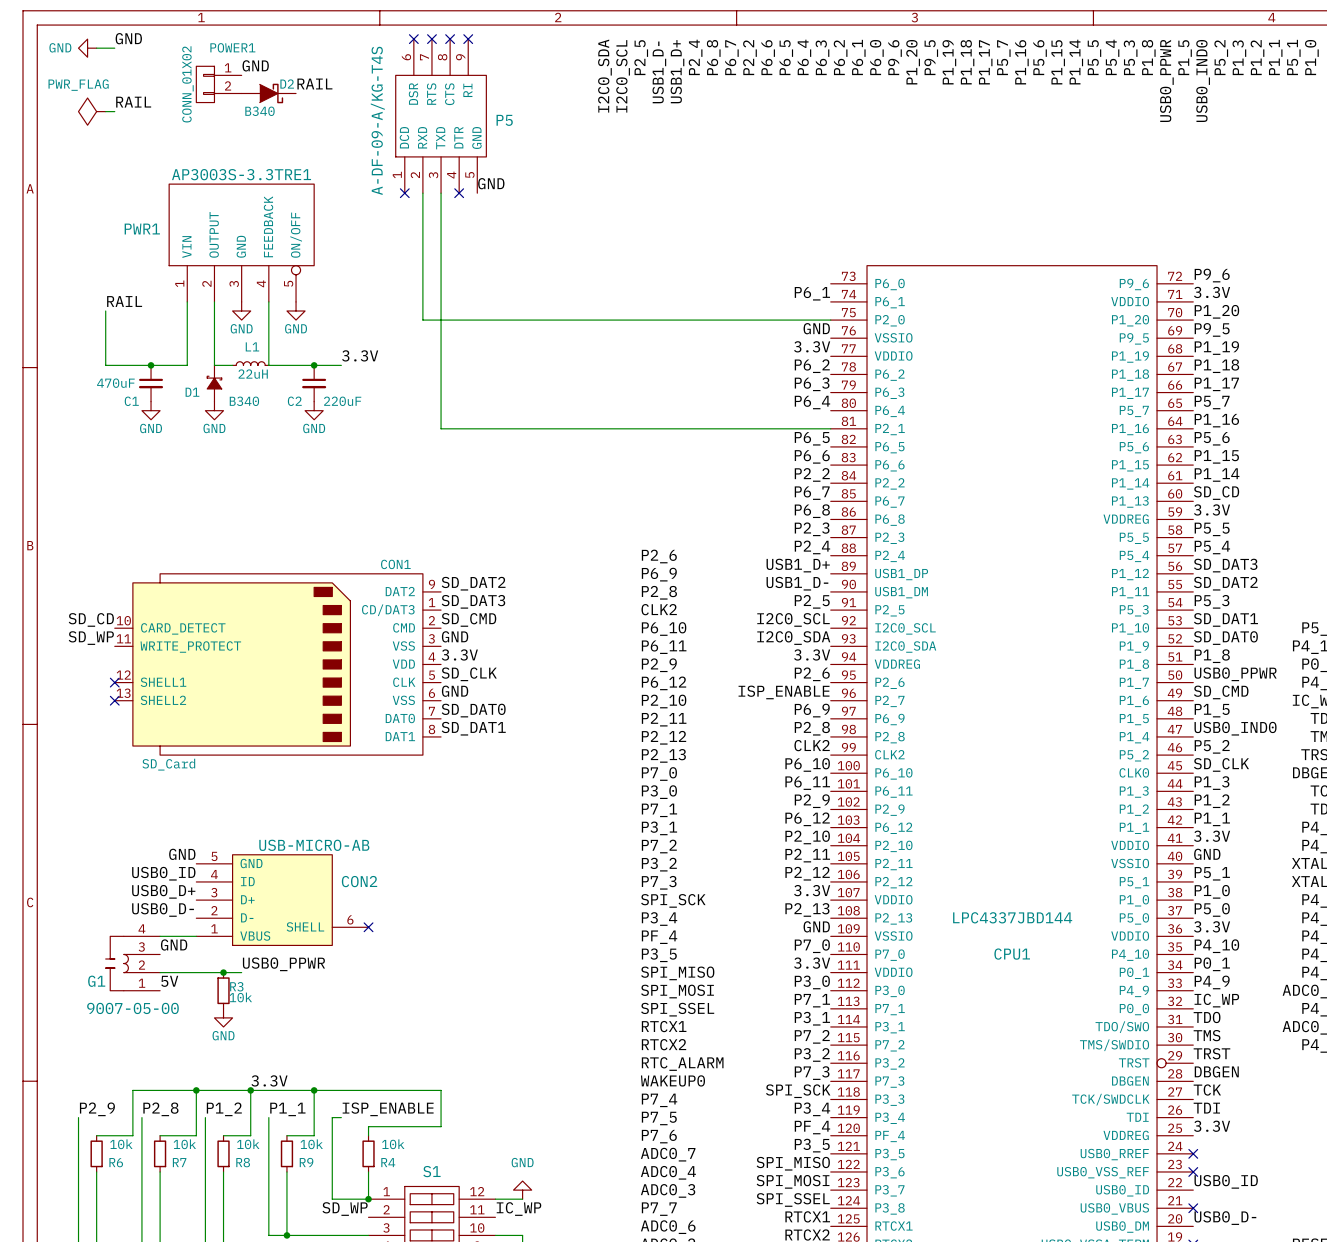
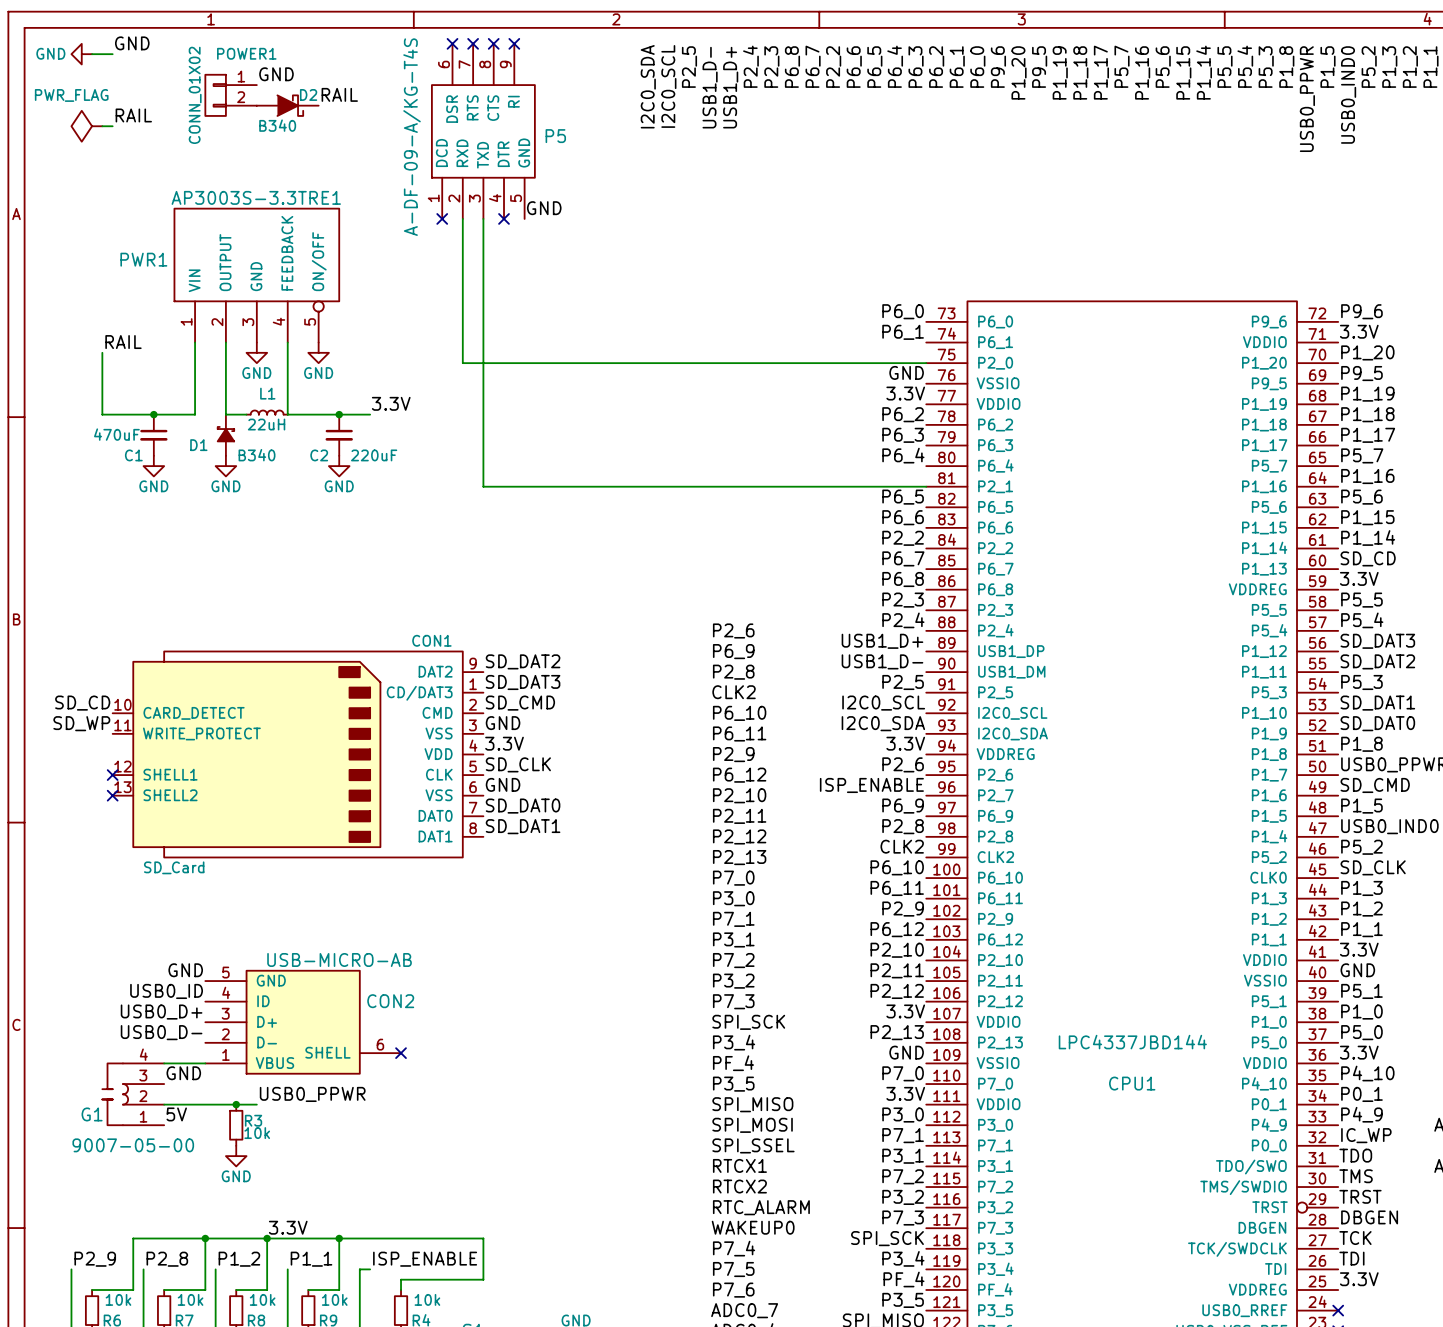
label: P2_5 (641, 57) -> USB1_D- (710, 87)
label: P2_4 (695, 57) -> P2_3 (771, 67)
label: USB1_D+ (677, 71) -> P2_4 (750, 66)
label: USB1_D- (659, 72) -> USB1_D+ (730, 87)
label: none -> I2C0_SDA (648, 86)
label: I2C0_SDA (604, 76) -> I2C0_SCL (668, 86)
label: I2C0_SCL (623, 76) -> P2_5 (689, 67)
label: none -> P6_0 (903, 311)

